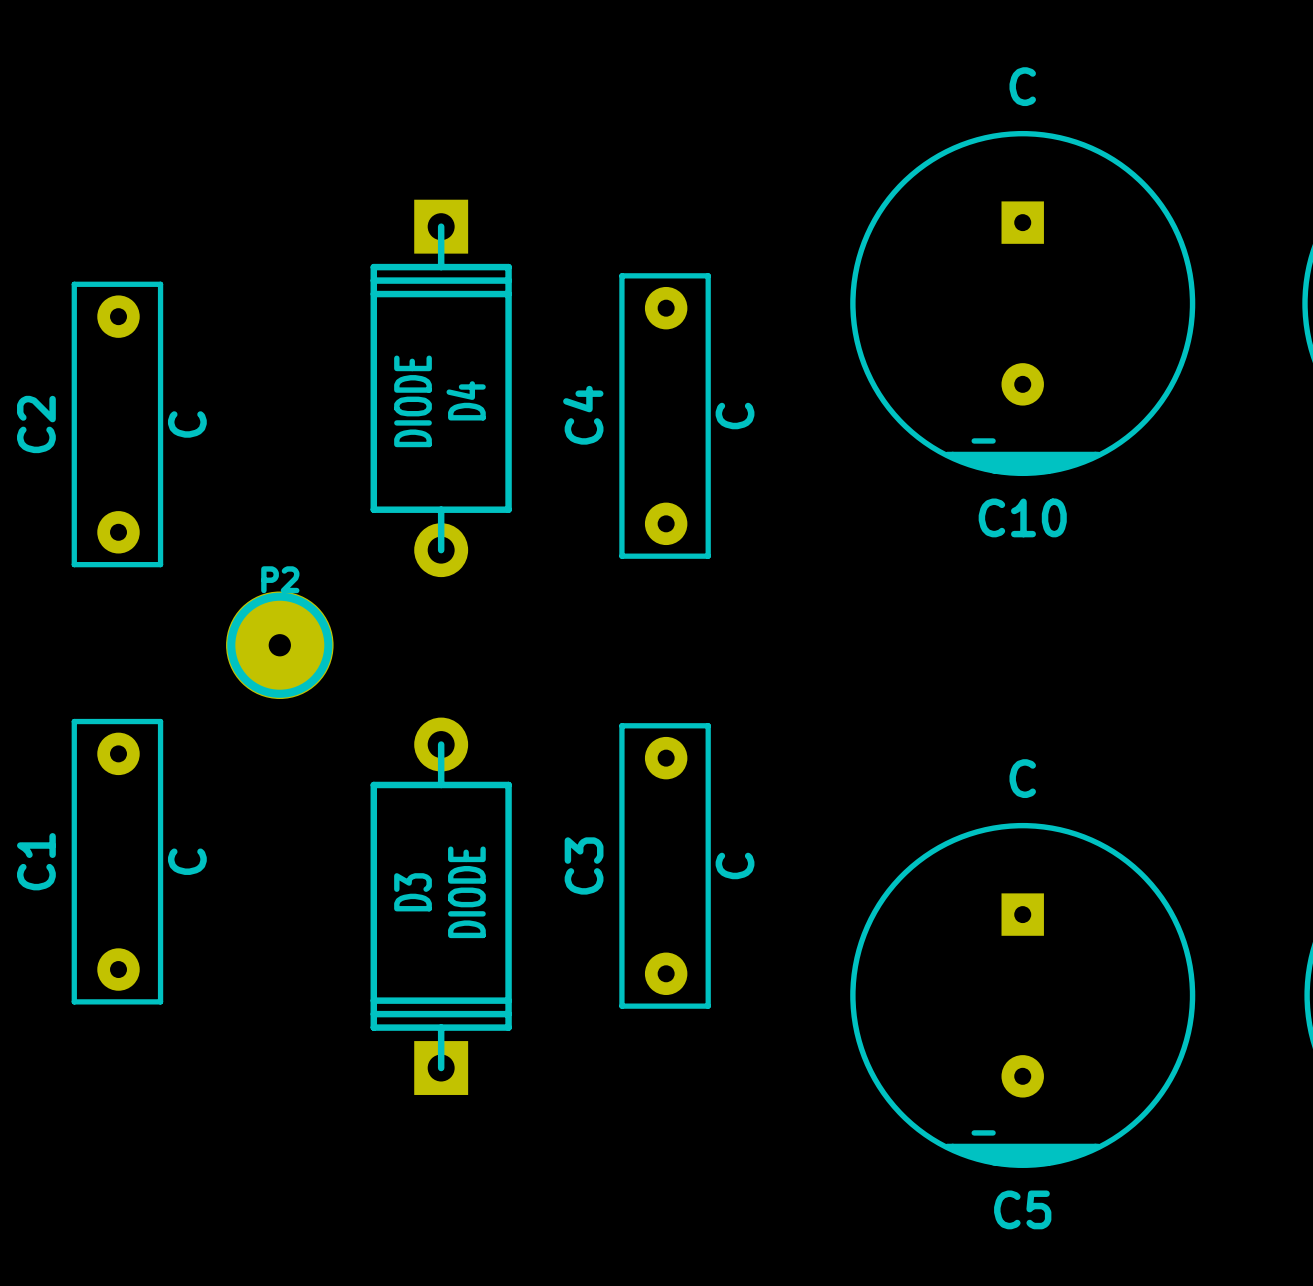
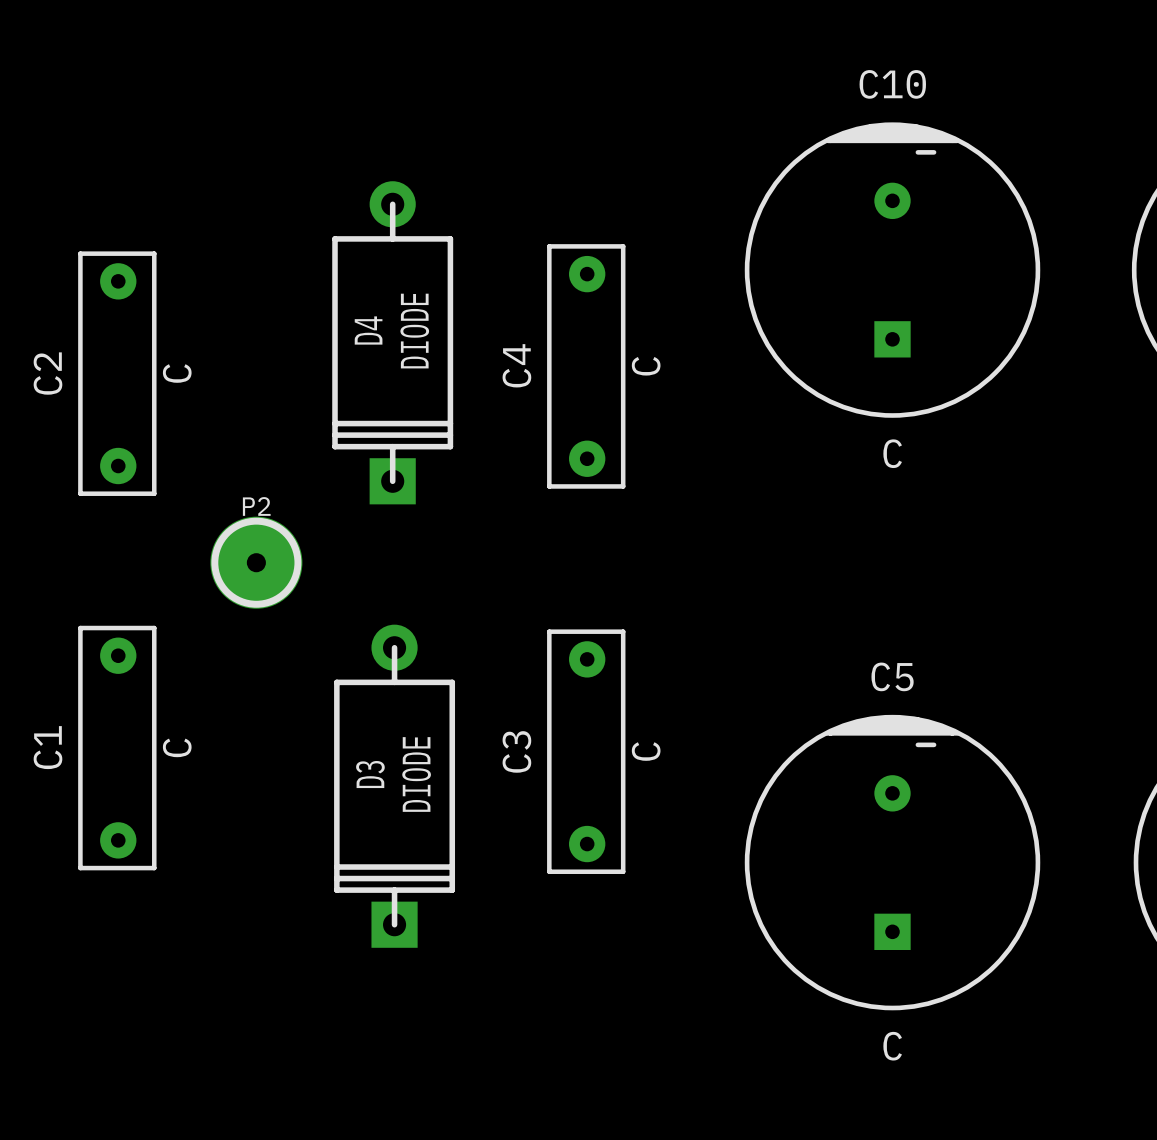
C10 rotation: 0° (1022, 303) -> 180° (892, 270)
D4 rotation: 0° (441, 388) -> 180° (392, 342)
C5 rotation: 0° (1022, 995) -> 180° (892, 862)

